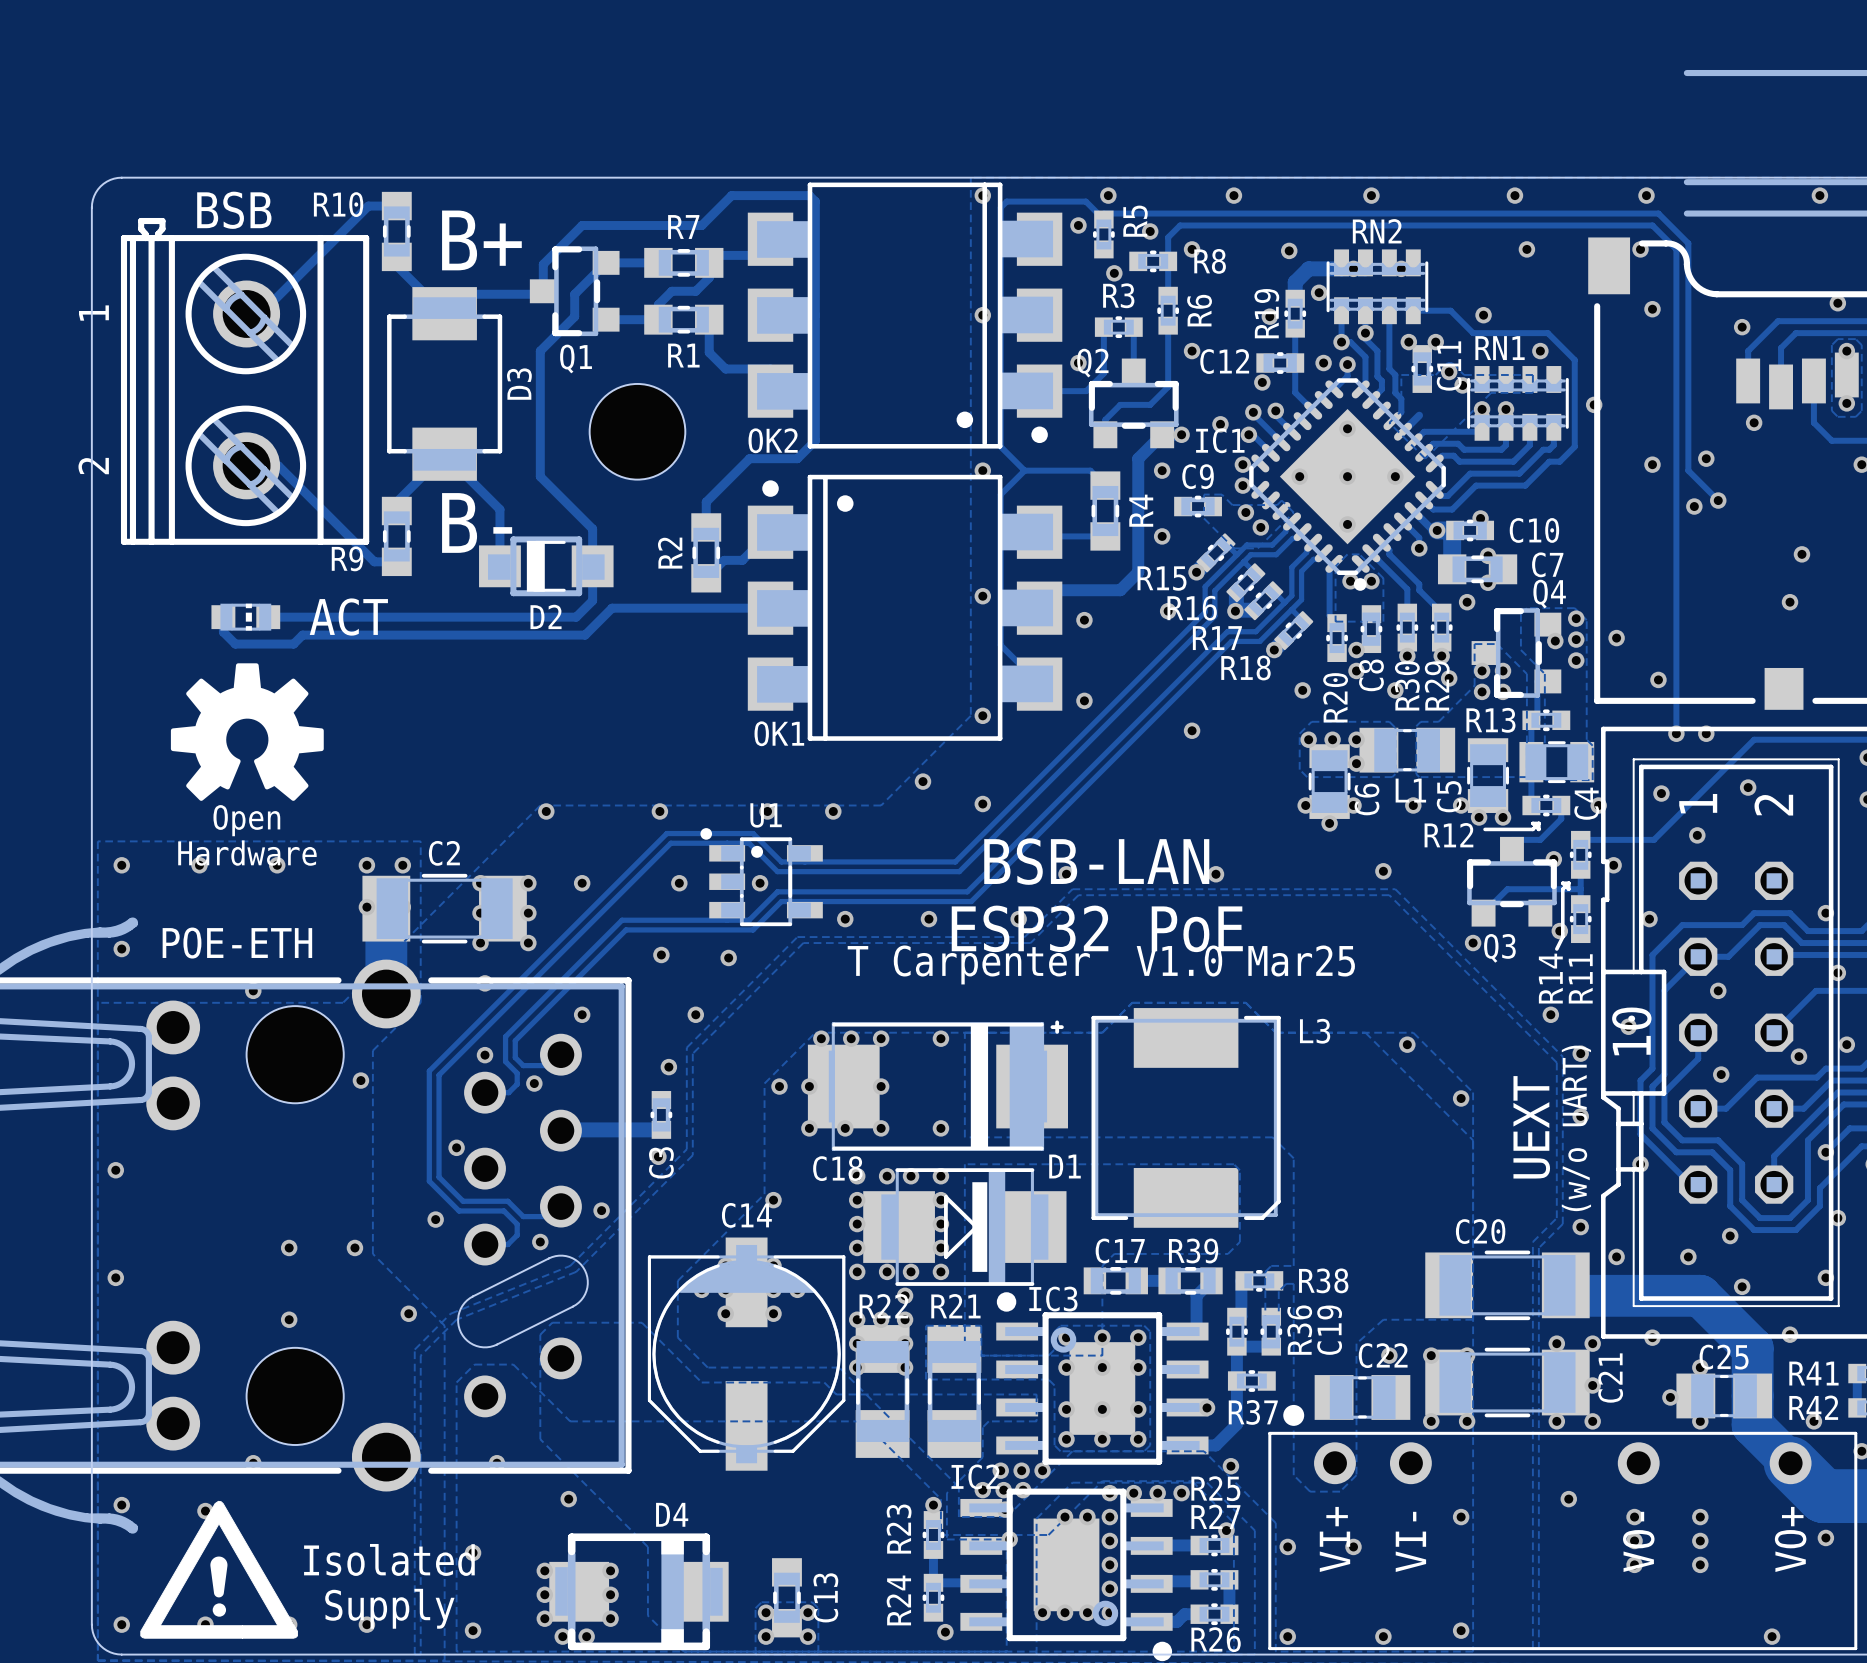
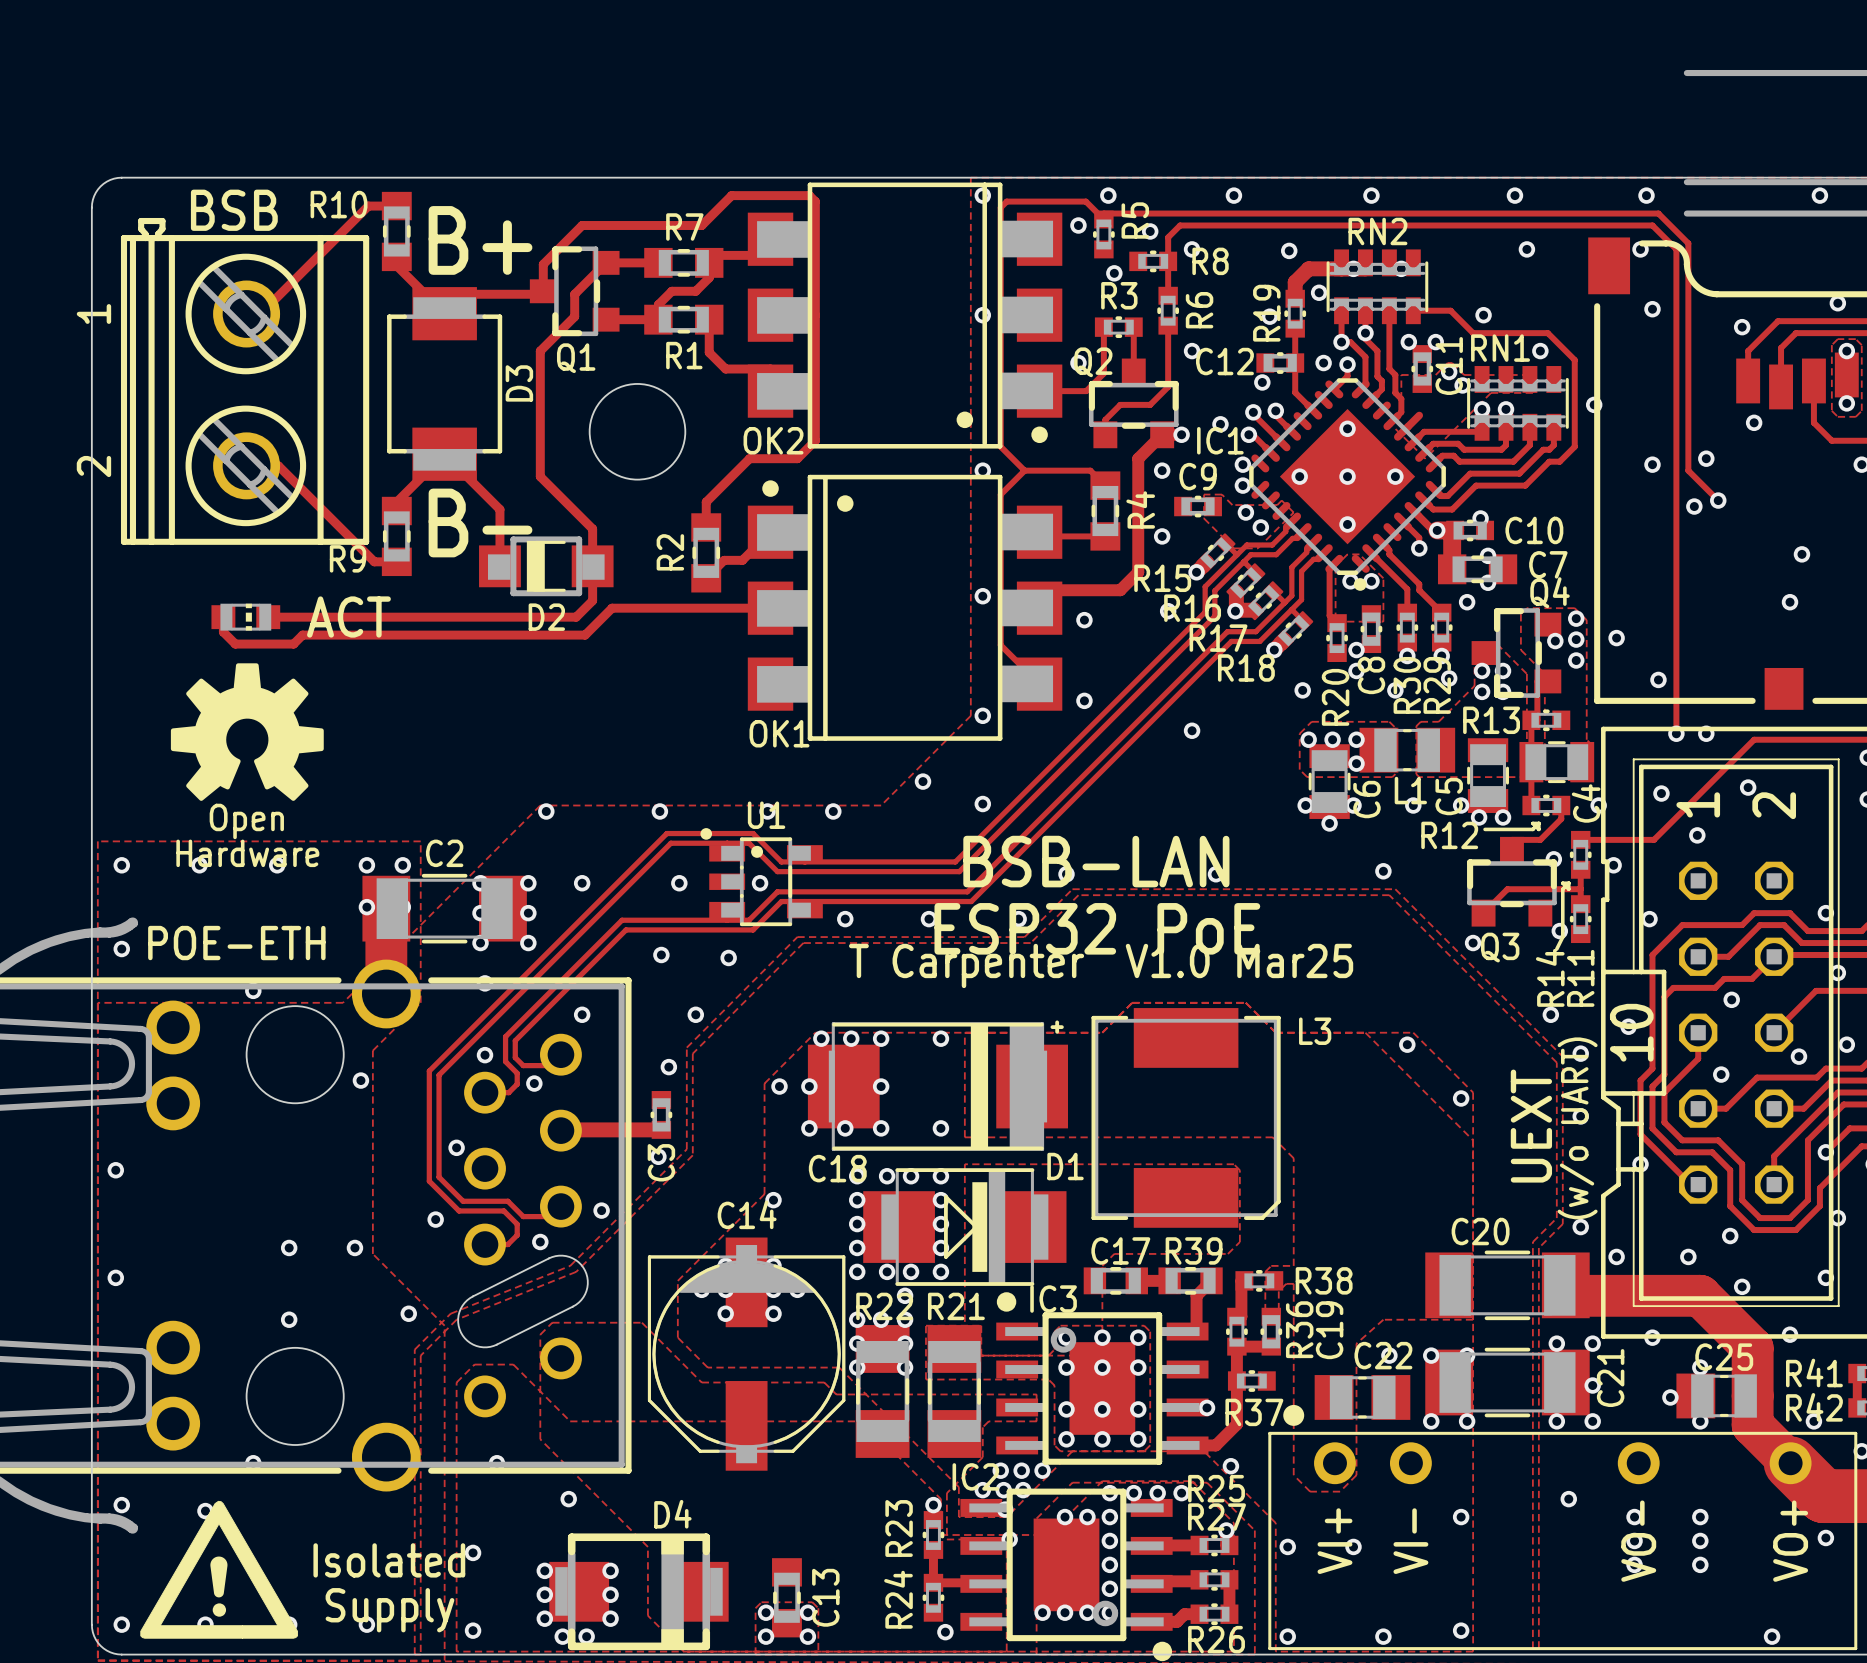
track: (1698, 956) (1664, 990) (1664, 996) -> (1774, 956) (1752, 978) (1724, 978) (1715, 987) (1673, 987) (1664, 996)
via position: (1718, 990) -> (1731, 999)

